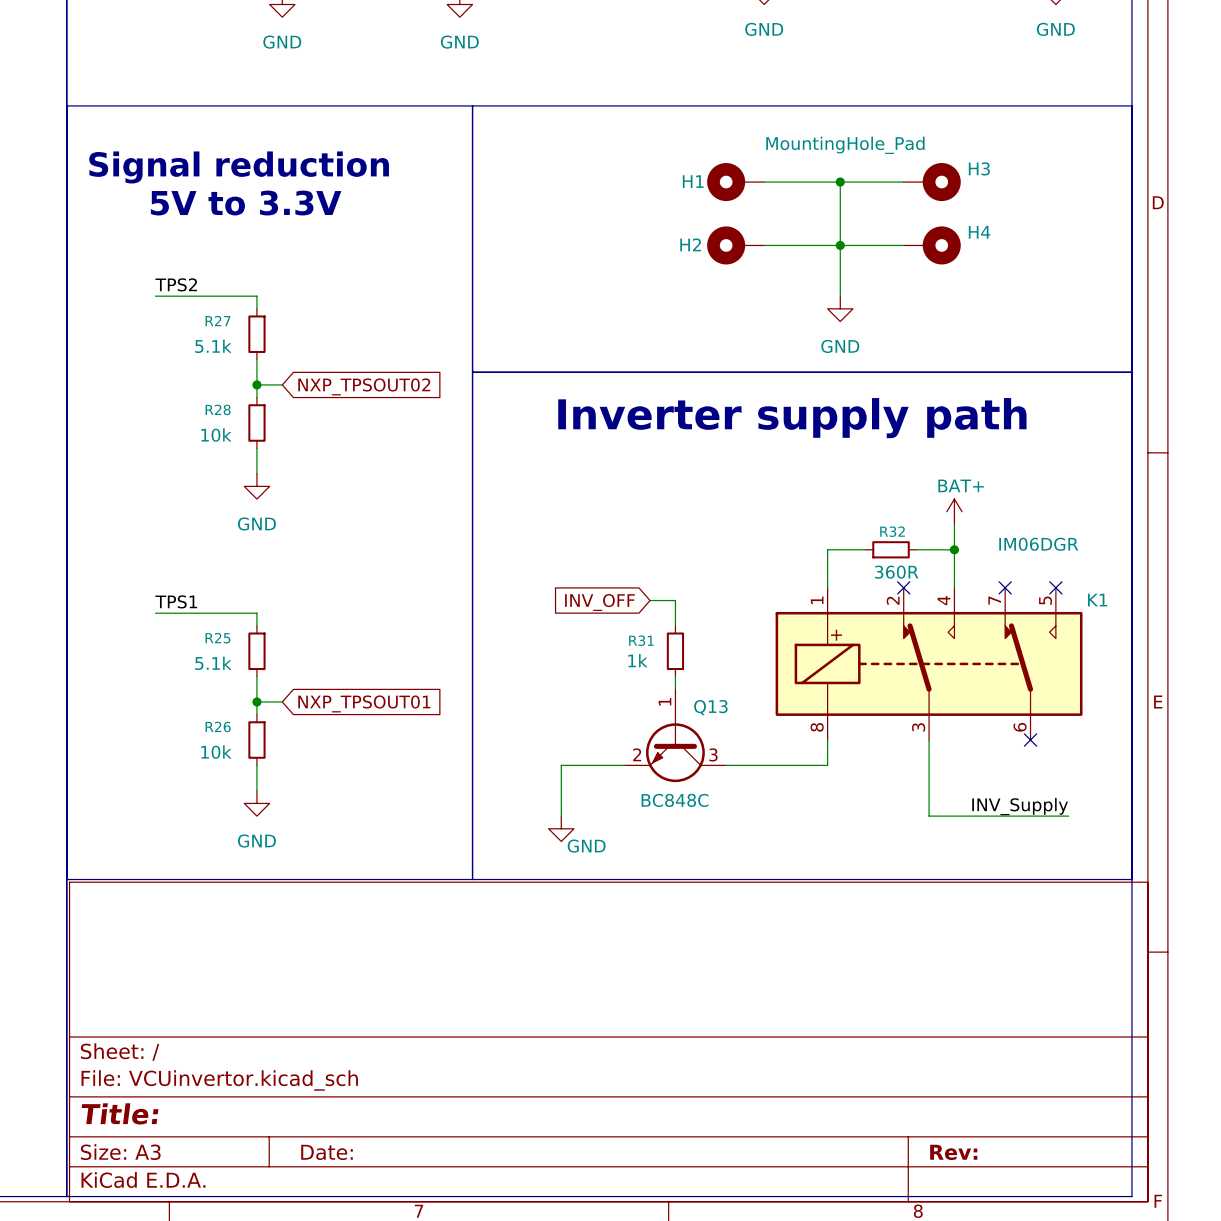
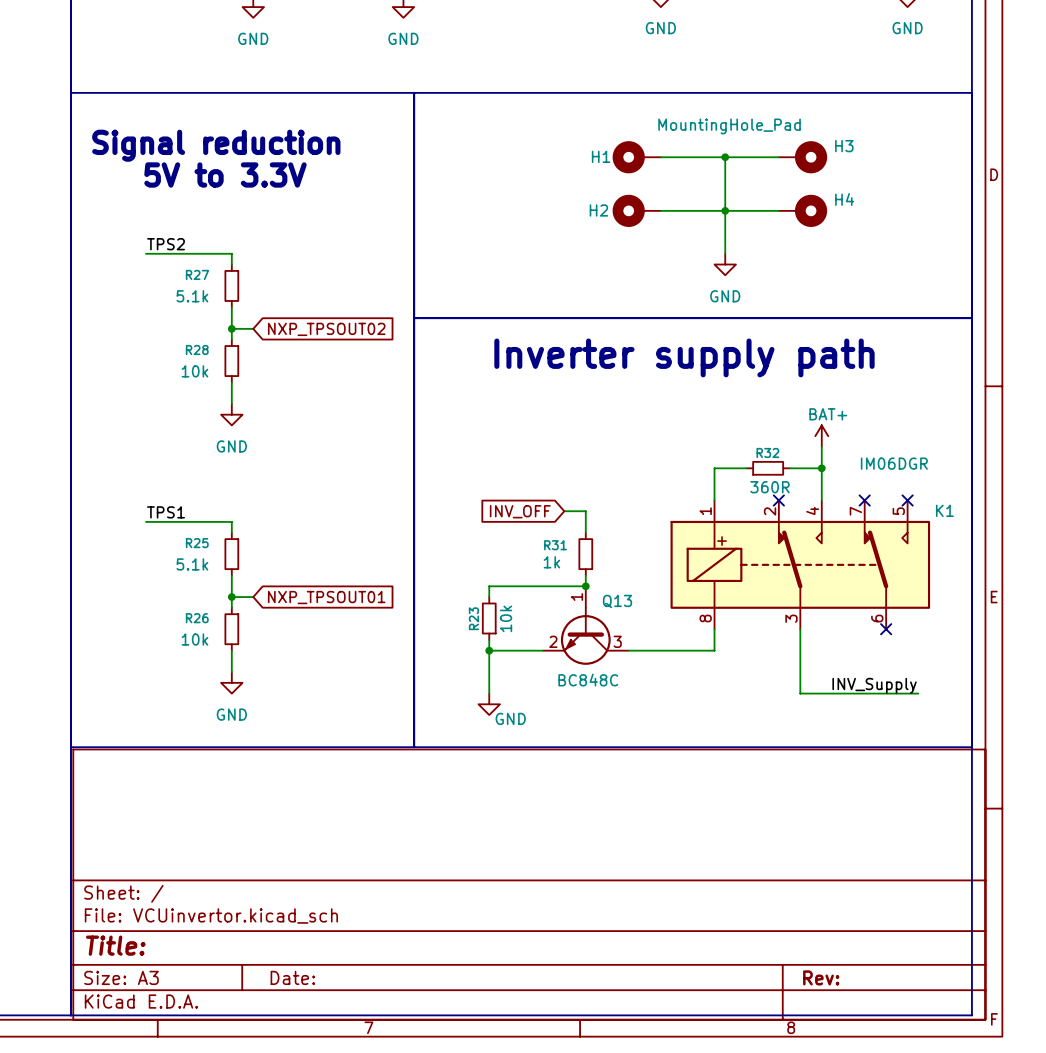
wire: none -> (585, 586) (489, 586) (489, 597)
junction: none -> (585, 586)
R23: none -> 10k (489, 618)
wire: none -> (489, 639) (489, 650)
junction: none -> (489, 650)

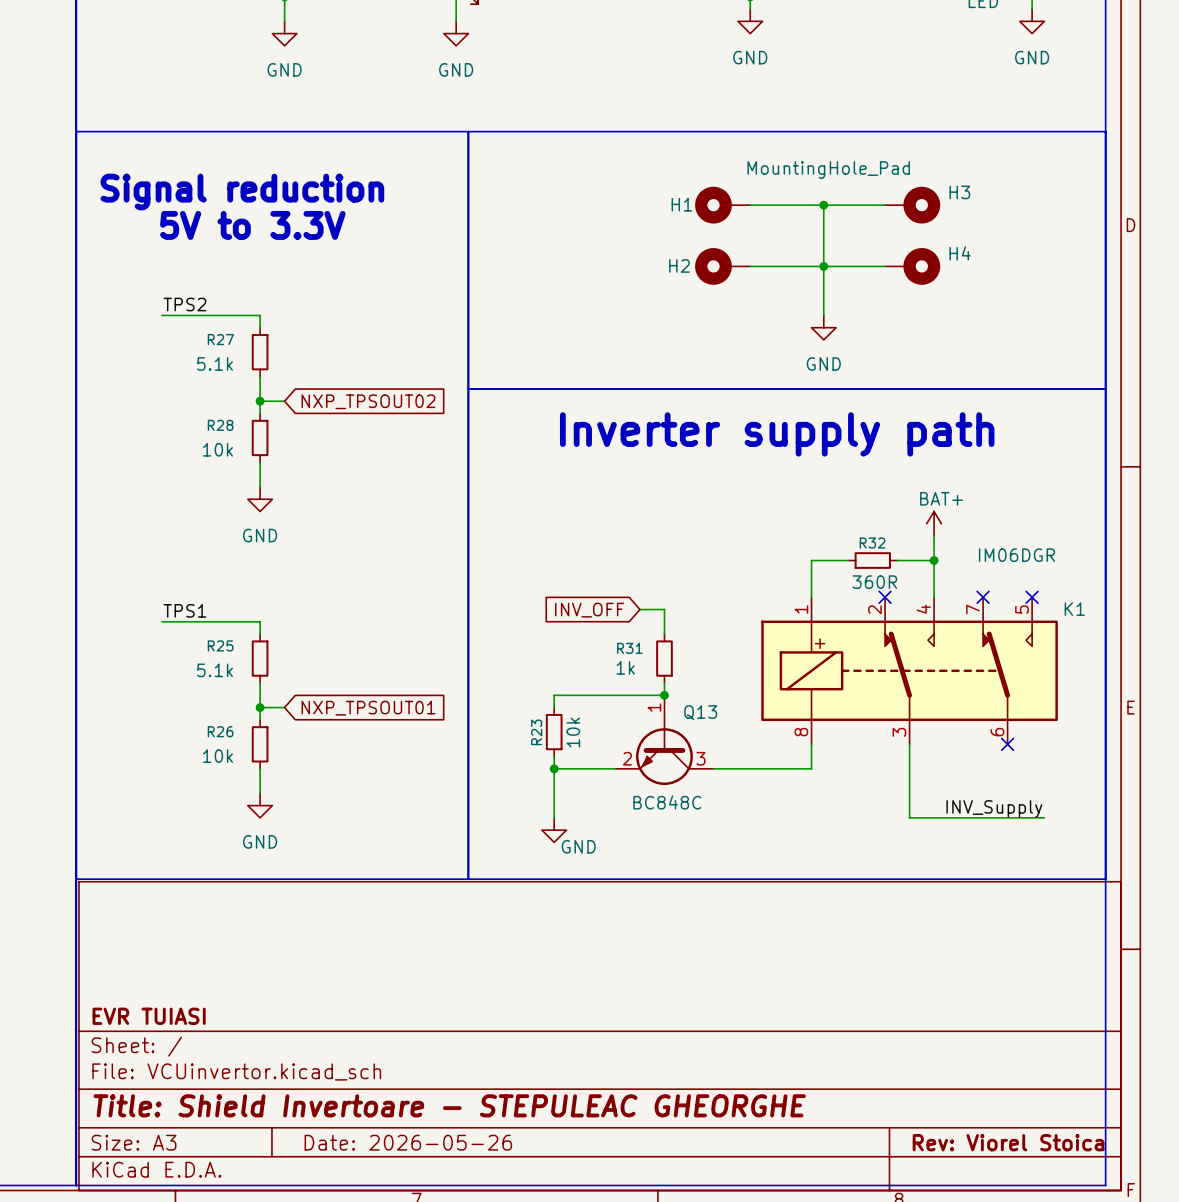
title block: none -> EVR TUIASI (149, 1016)
title block: Title: (115, 945) -> Title: Shield Invertoare - STEPULEAC GHEORGHE (449, 1105)
title block: Date: (292, 977) -> Date: 2026-05-26 (408, 1142)
title block: Rev: (821, 977) -> Rev: Viorel Stoica (1008, 1142)

